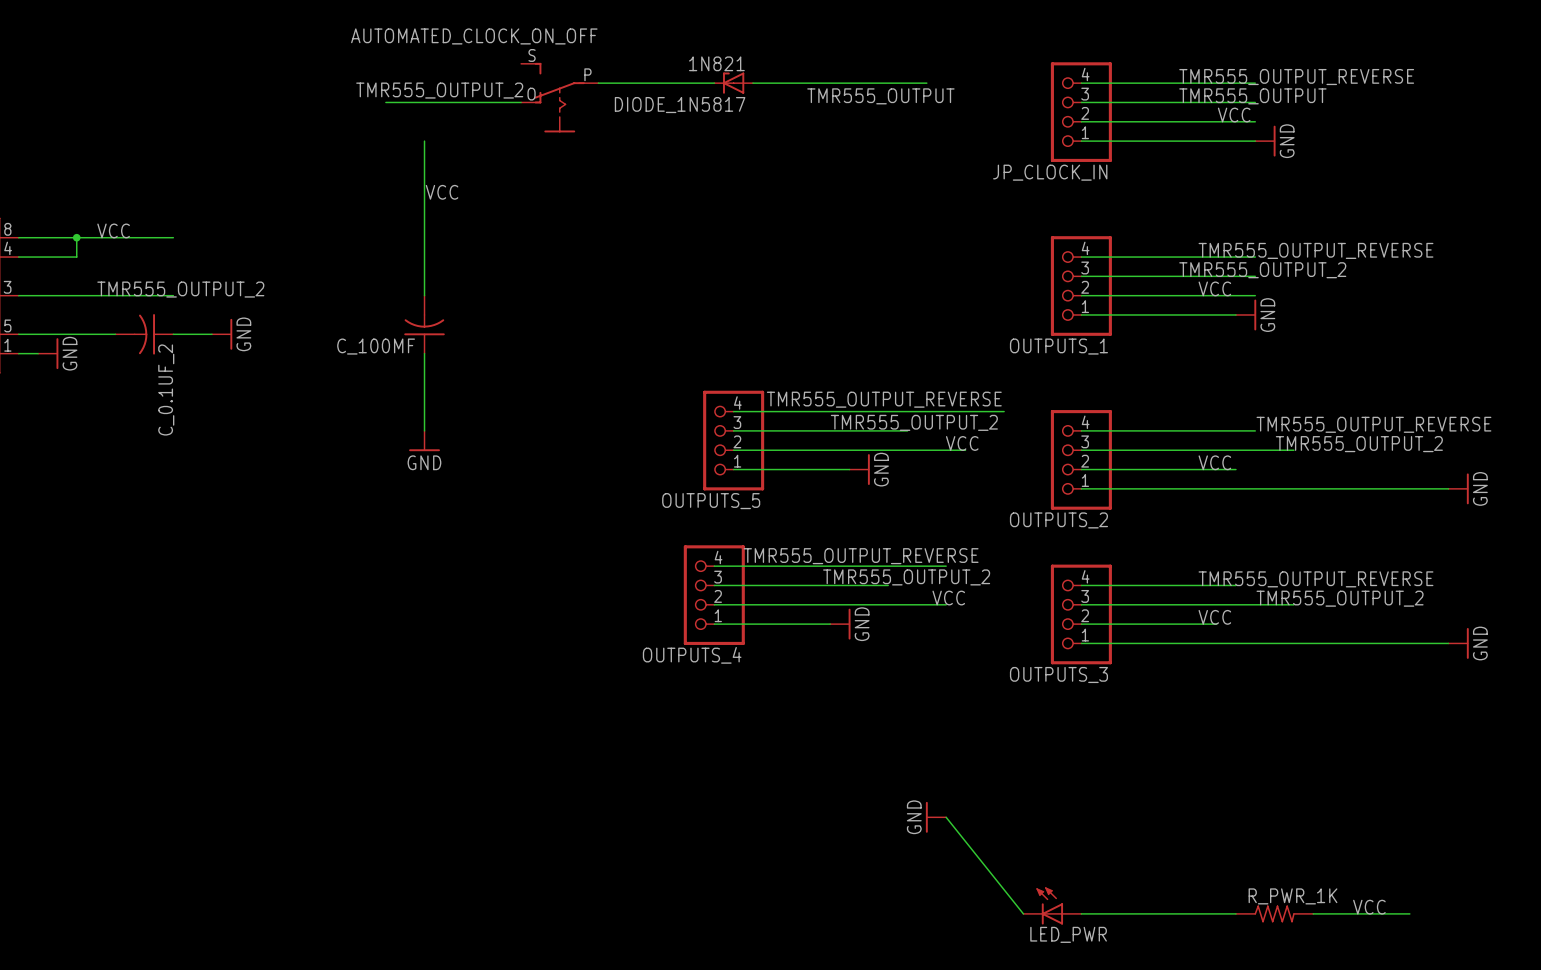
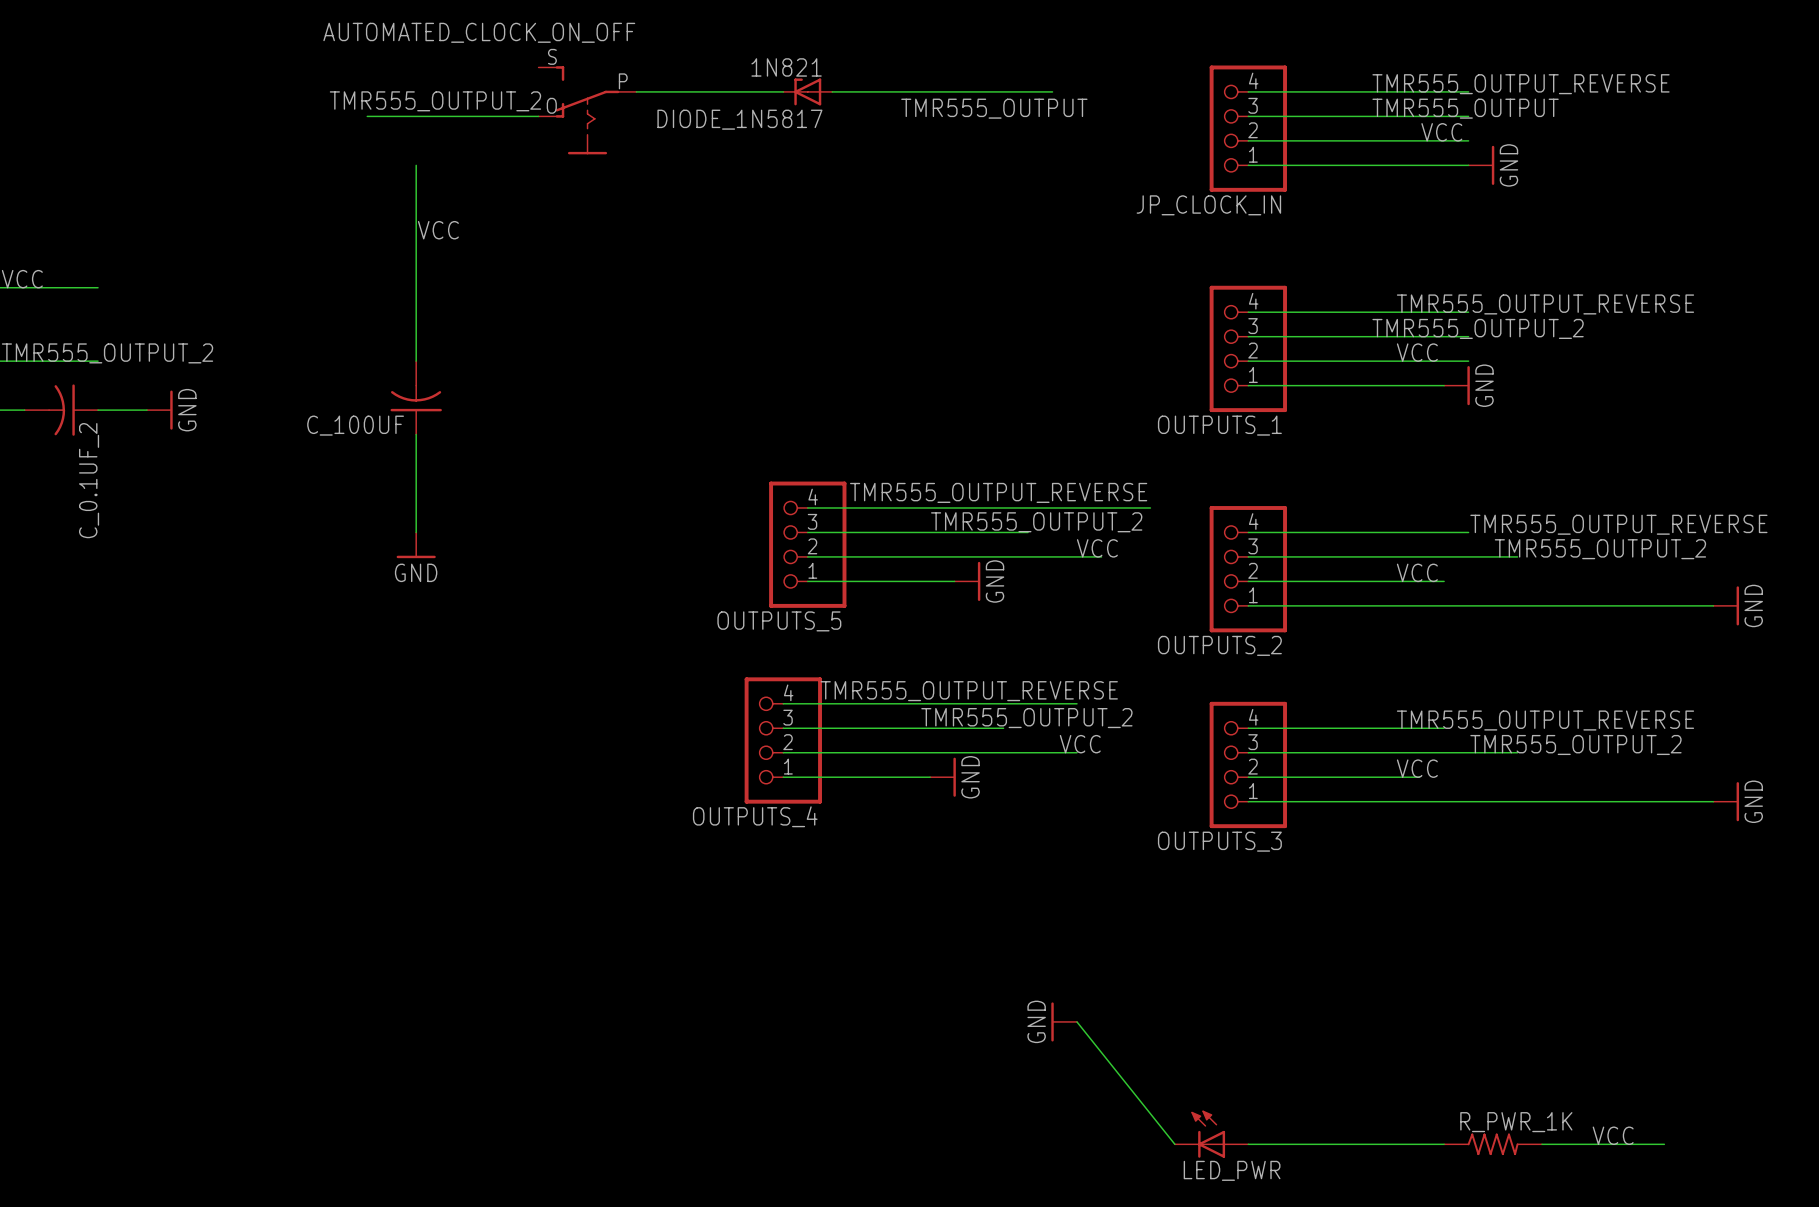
C_100MF name: C_100MF (376, 346) -> C_100UF (355, 425)

